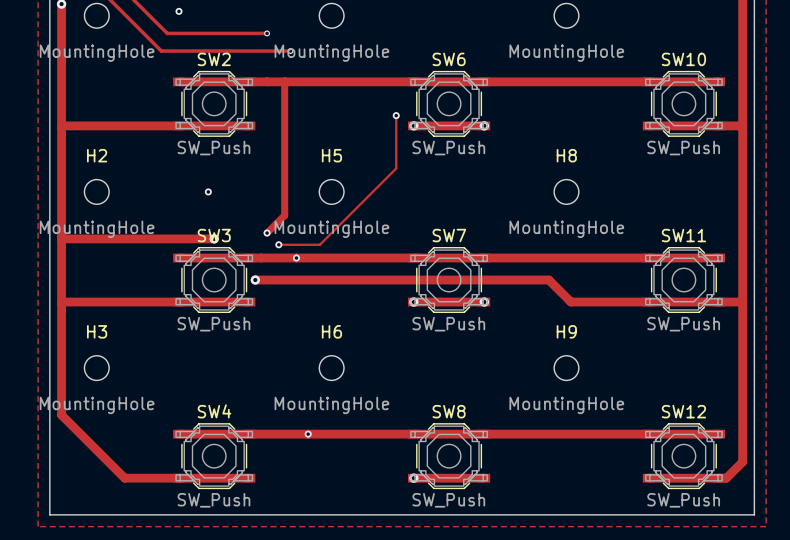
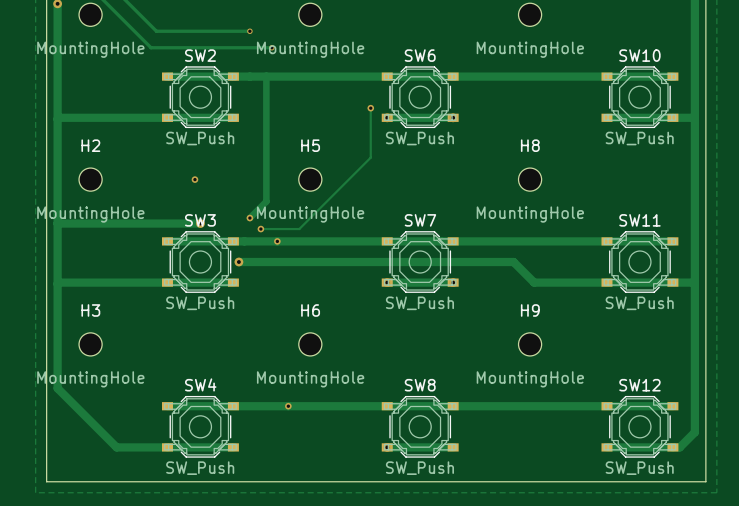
via: (179, 11) -> none

